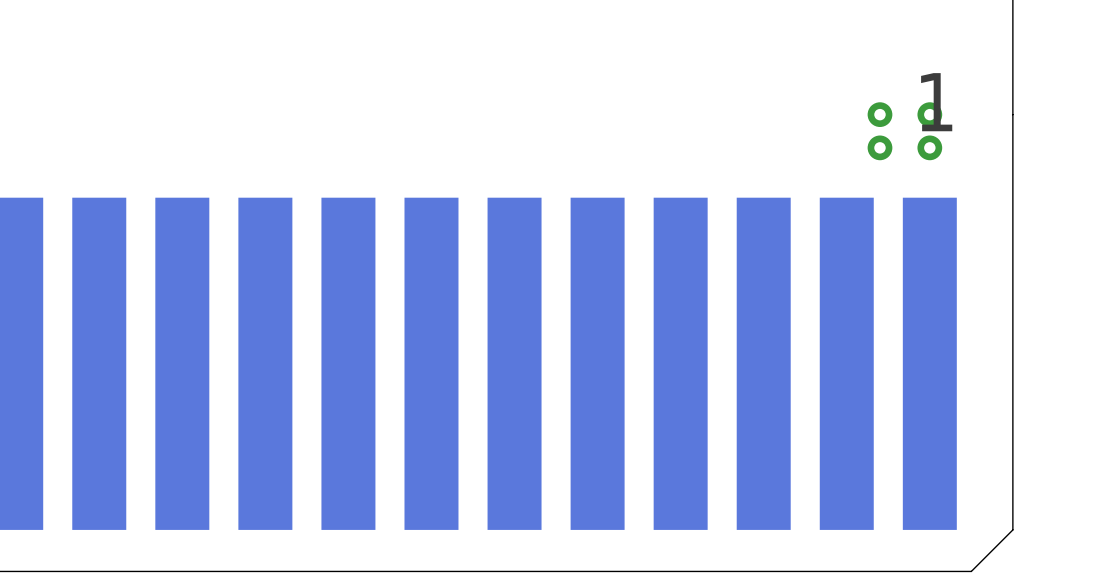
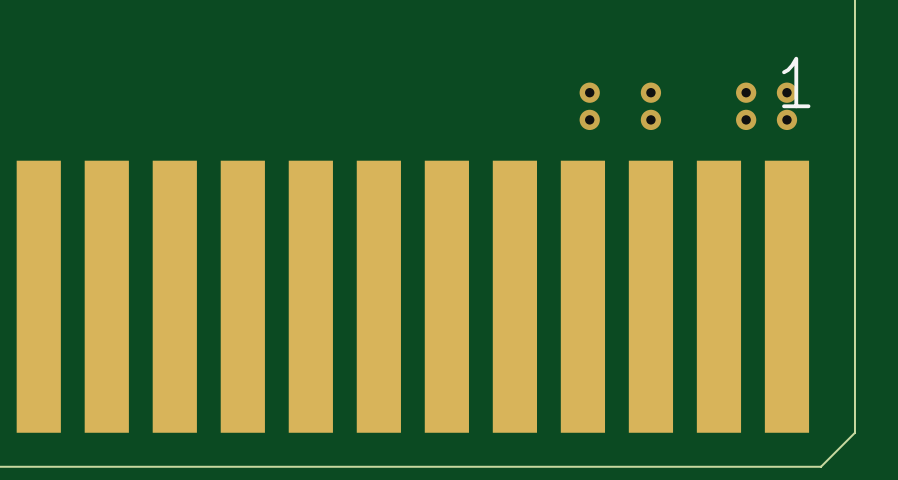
via: none -> (589, 92)
via: none -> (650, 92)
via: none -> (589, 119)
via: none -> (650, 119)

